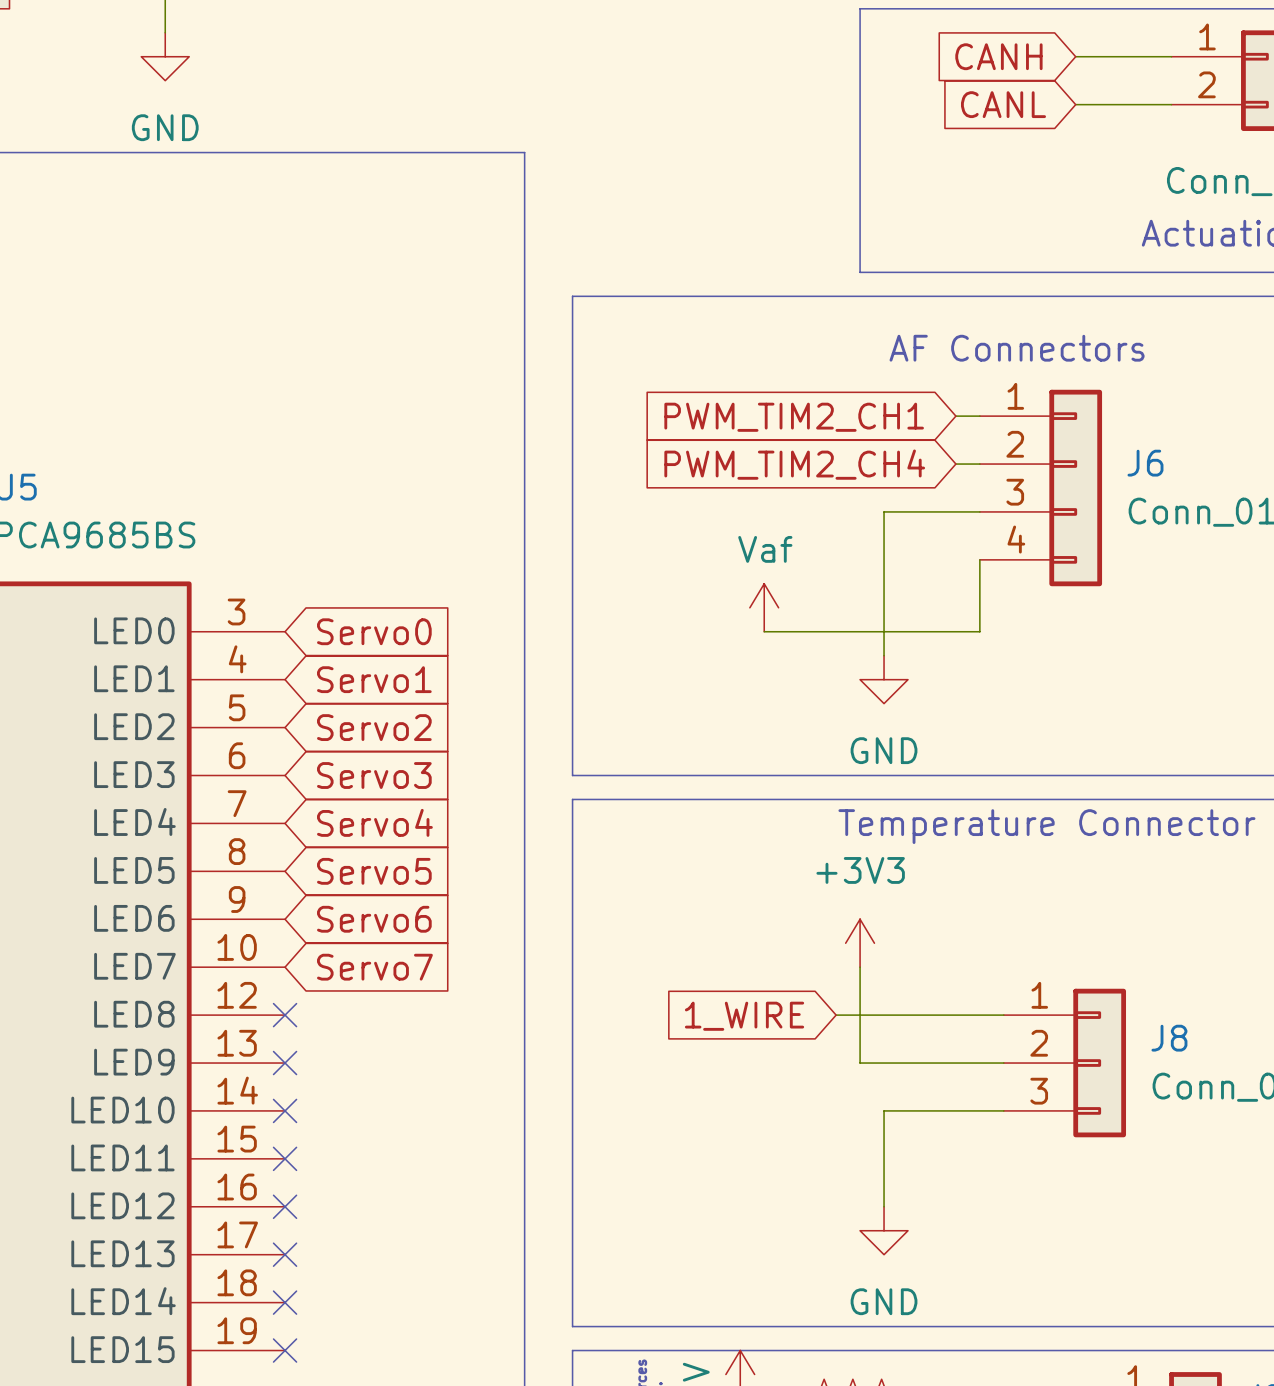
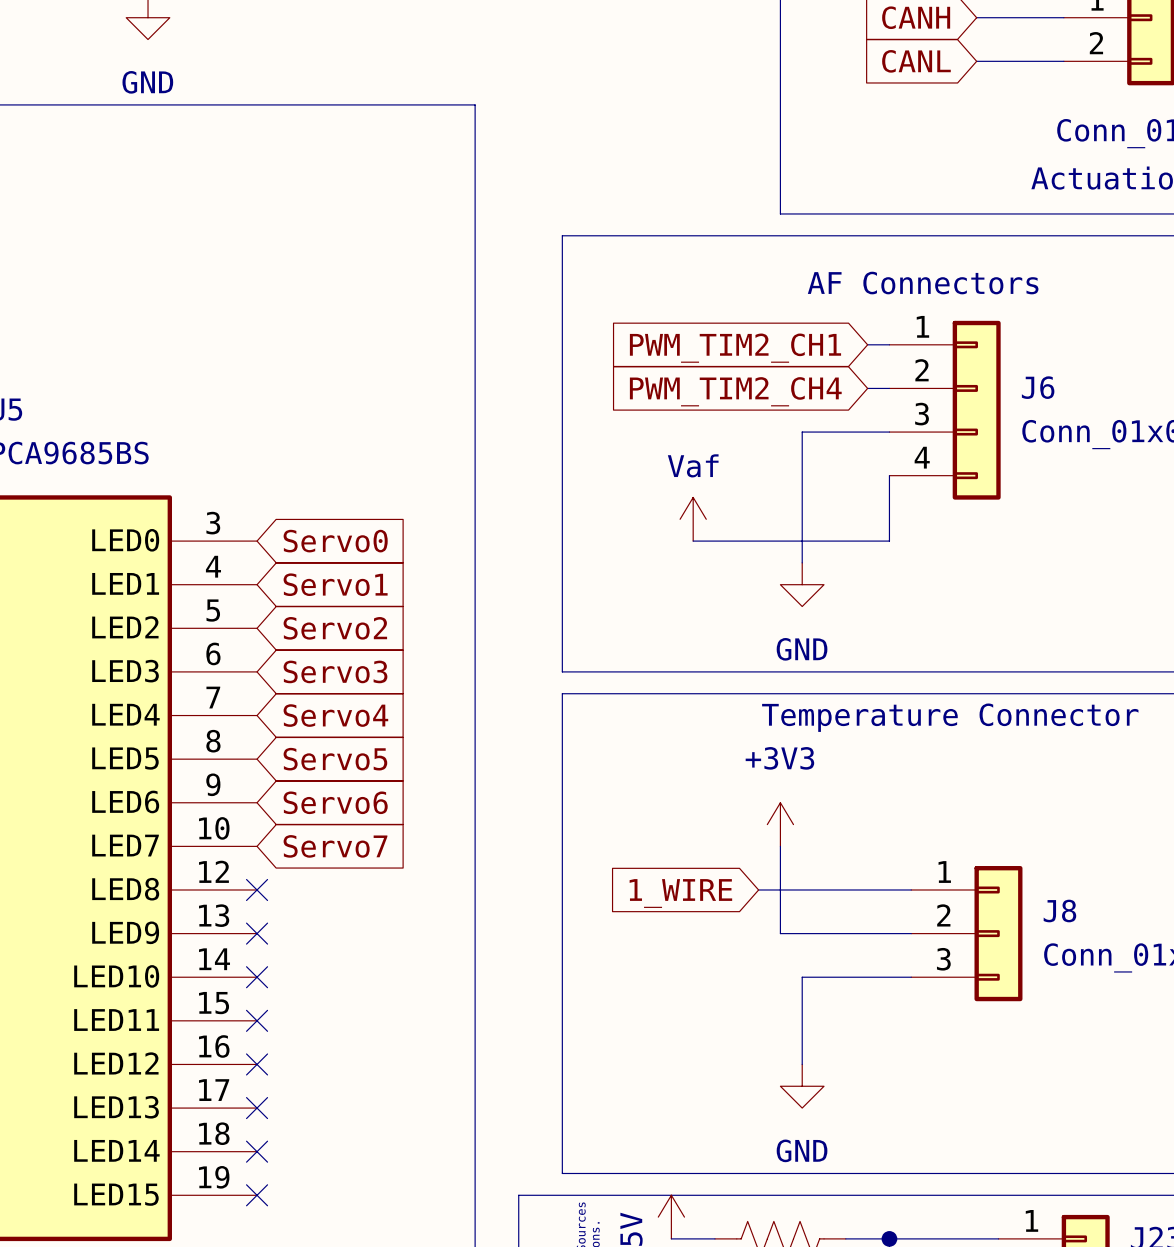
line: (620, 296) (572, 296) (572, 775) (620, 775) -> (562, 235) (562, 671)
line: (620, 799) (572, 799) (572, 1326) (620, 1326) -> (562, 693) (562, 1173)

